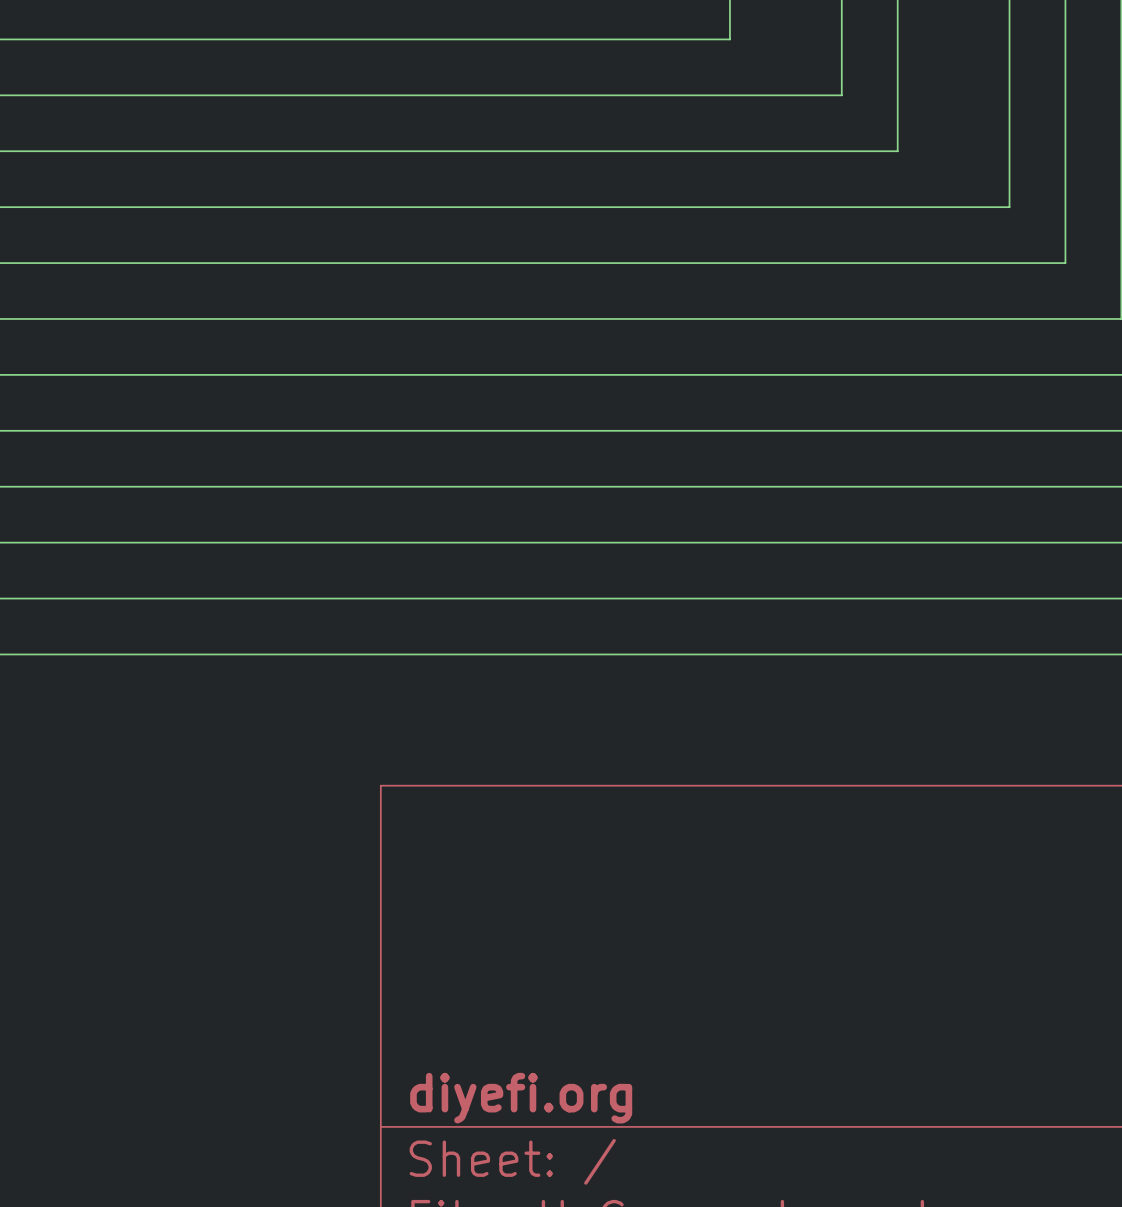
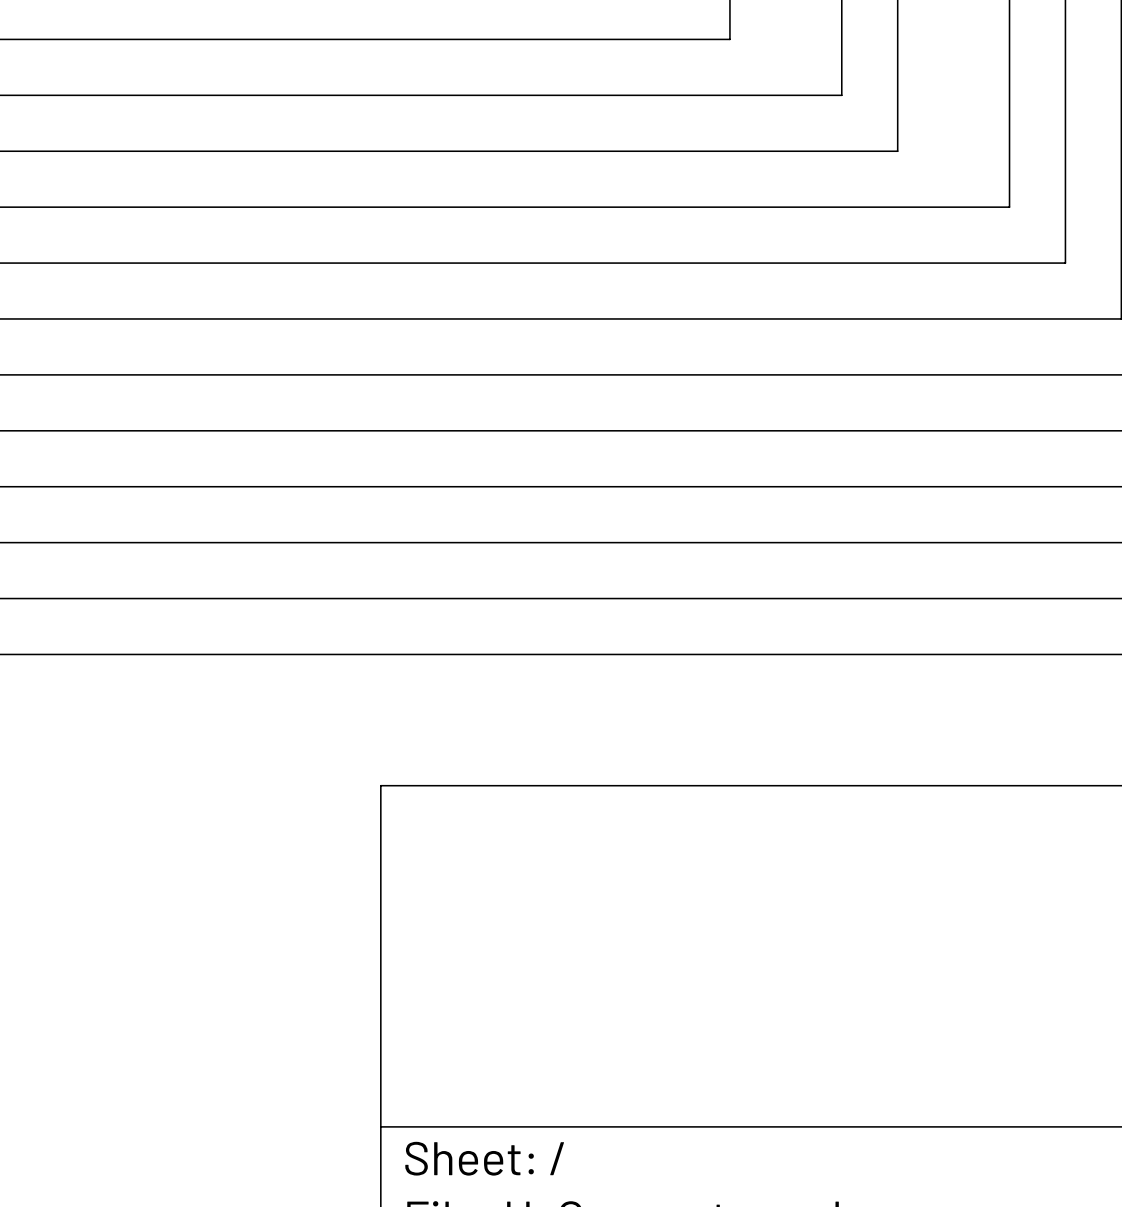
title block: diyefi.org (521, 1098) -> none

